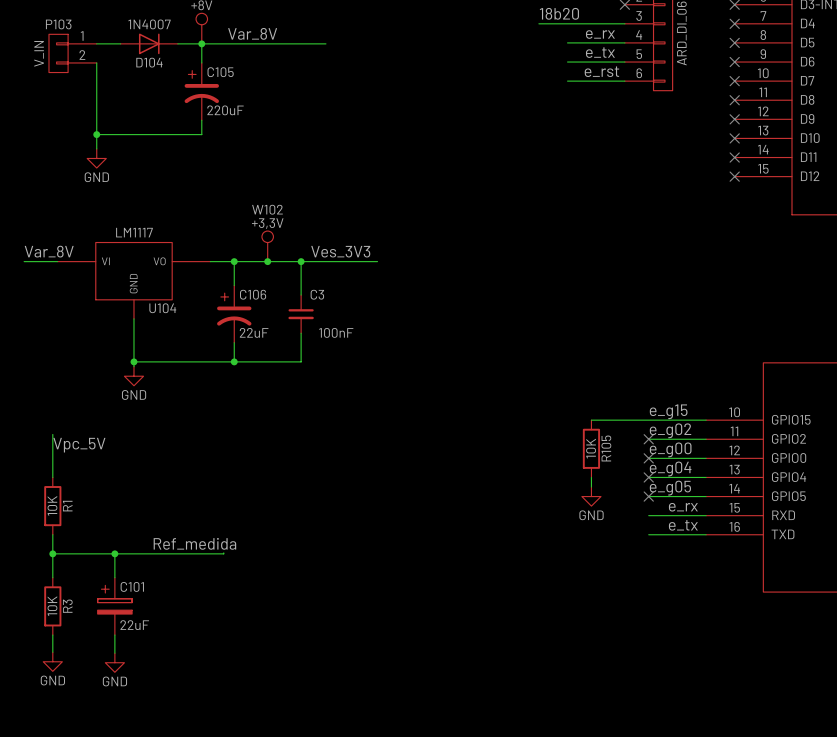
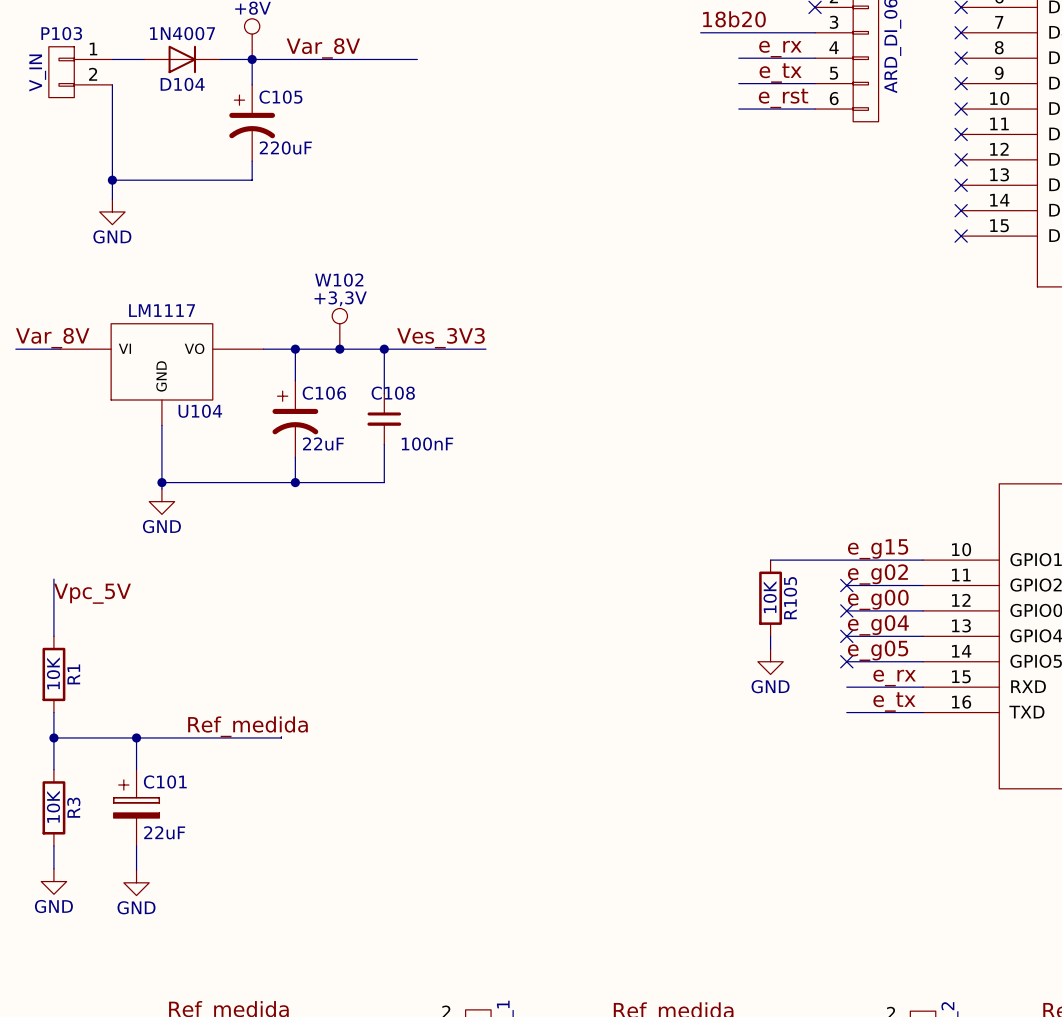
C3 name: C3 (317, 294) -> C108 (393, 393)

